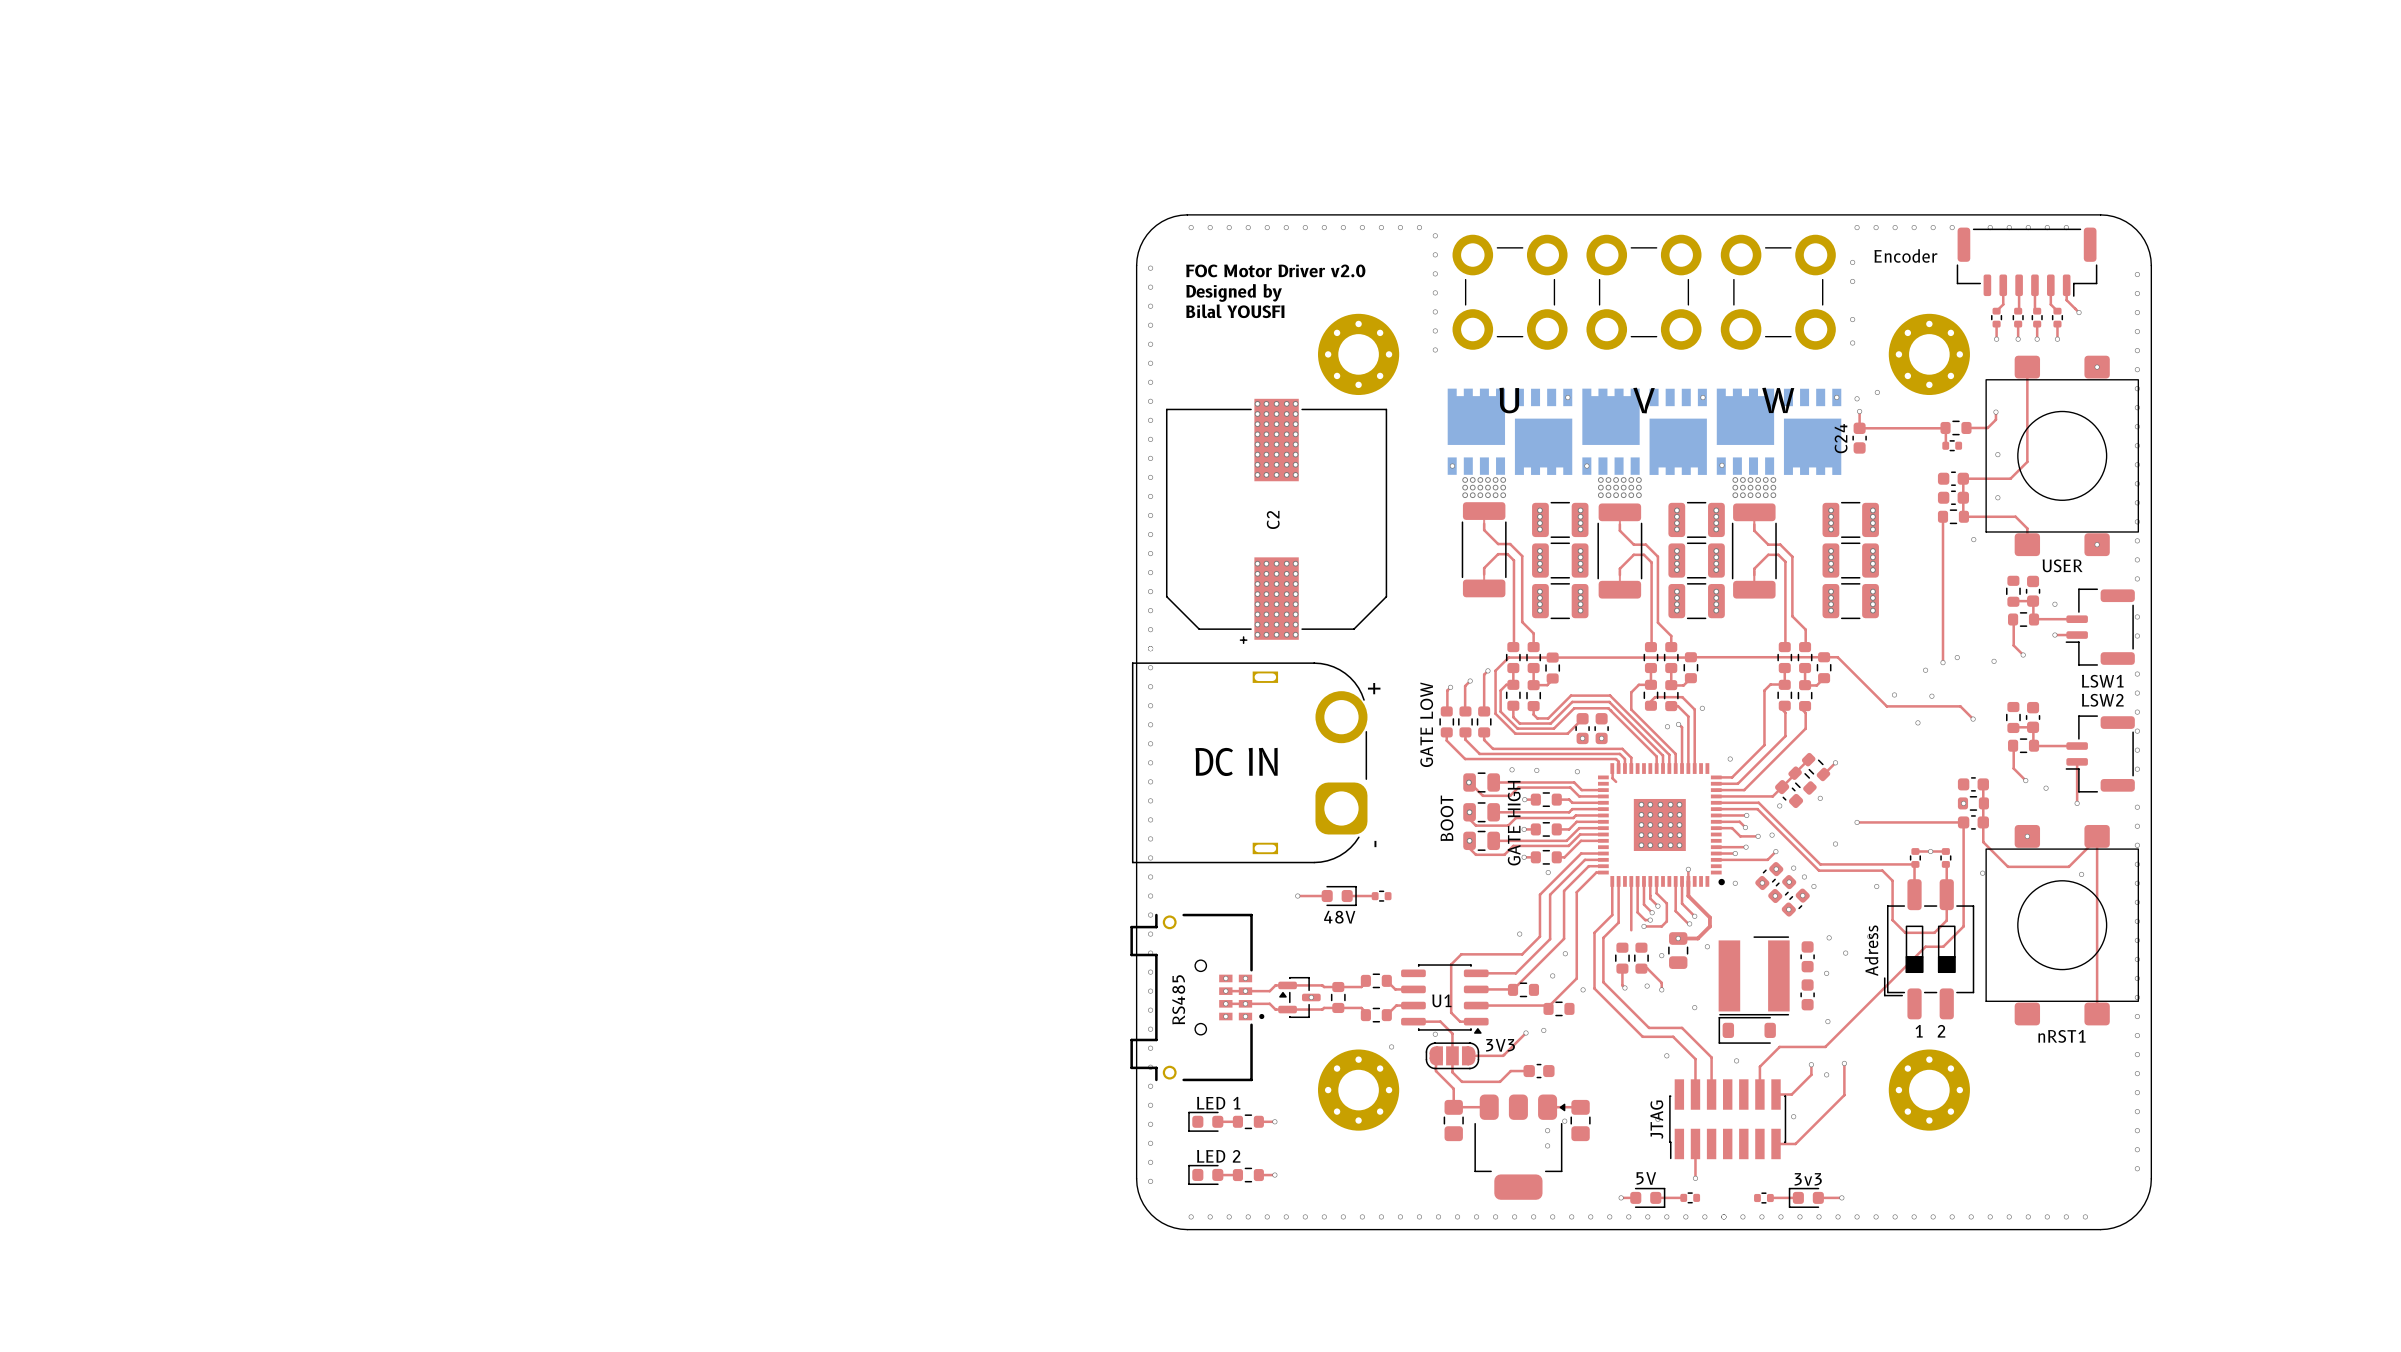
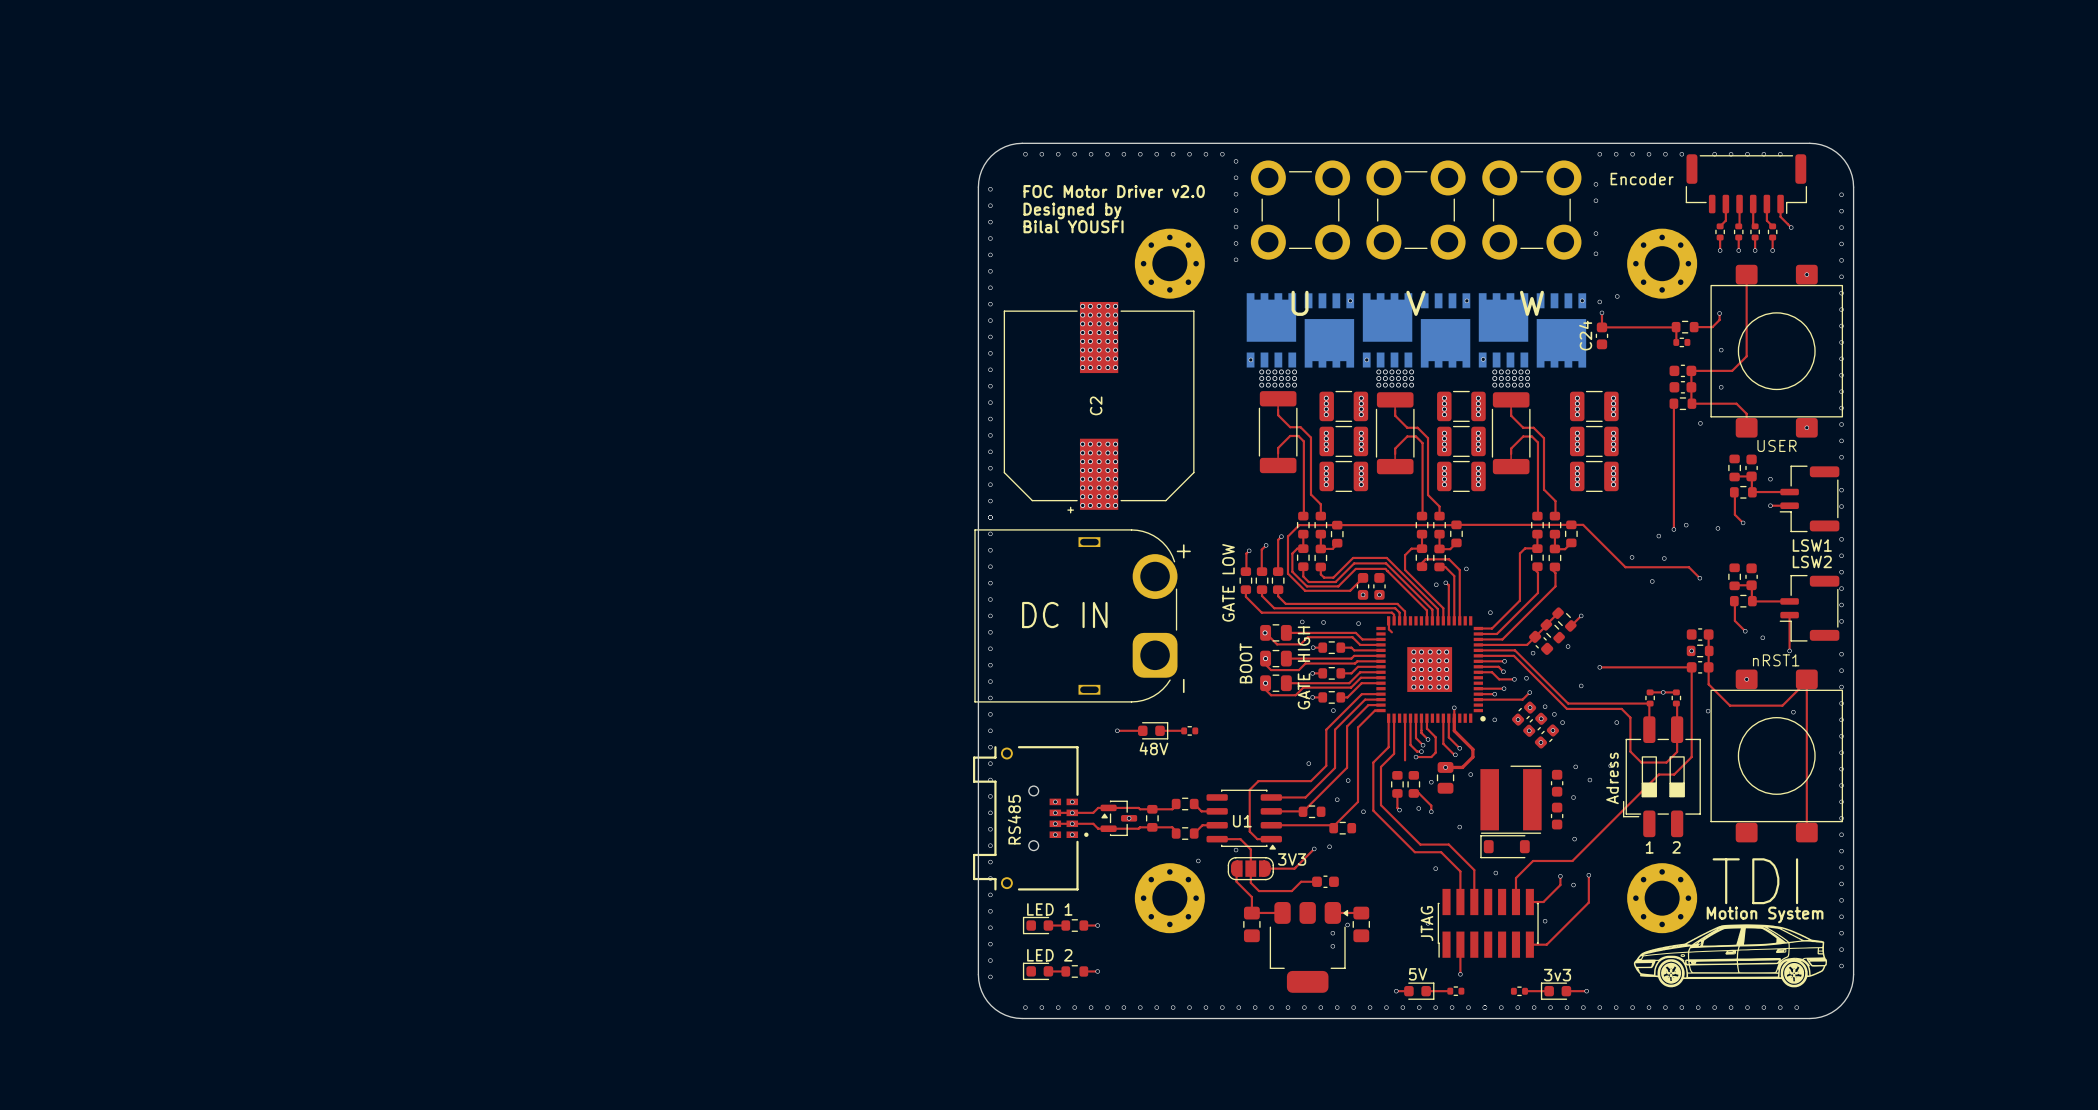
nRST1 name position: nRST1 (2062, 1036) -> nRST1 (1776, 660)
text: none -> TDI (1755, 881)
text: none -> Motion System (1765, 914)
drawing: none -> [1633, 924, 1828, 988]

